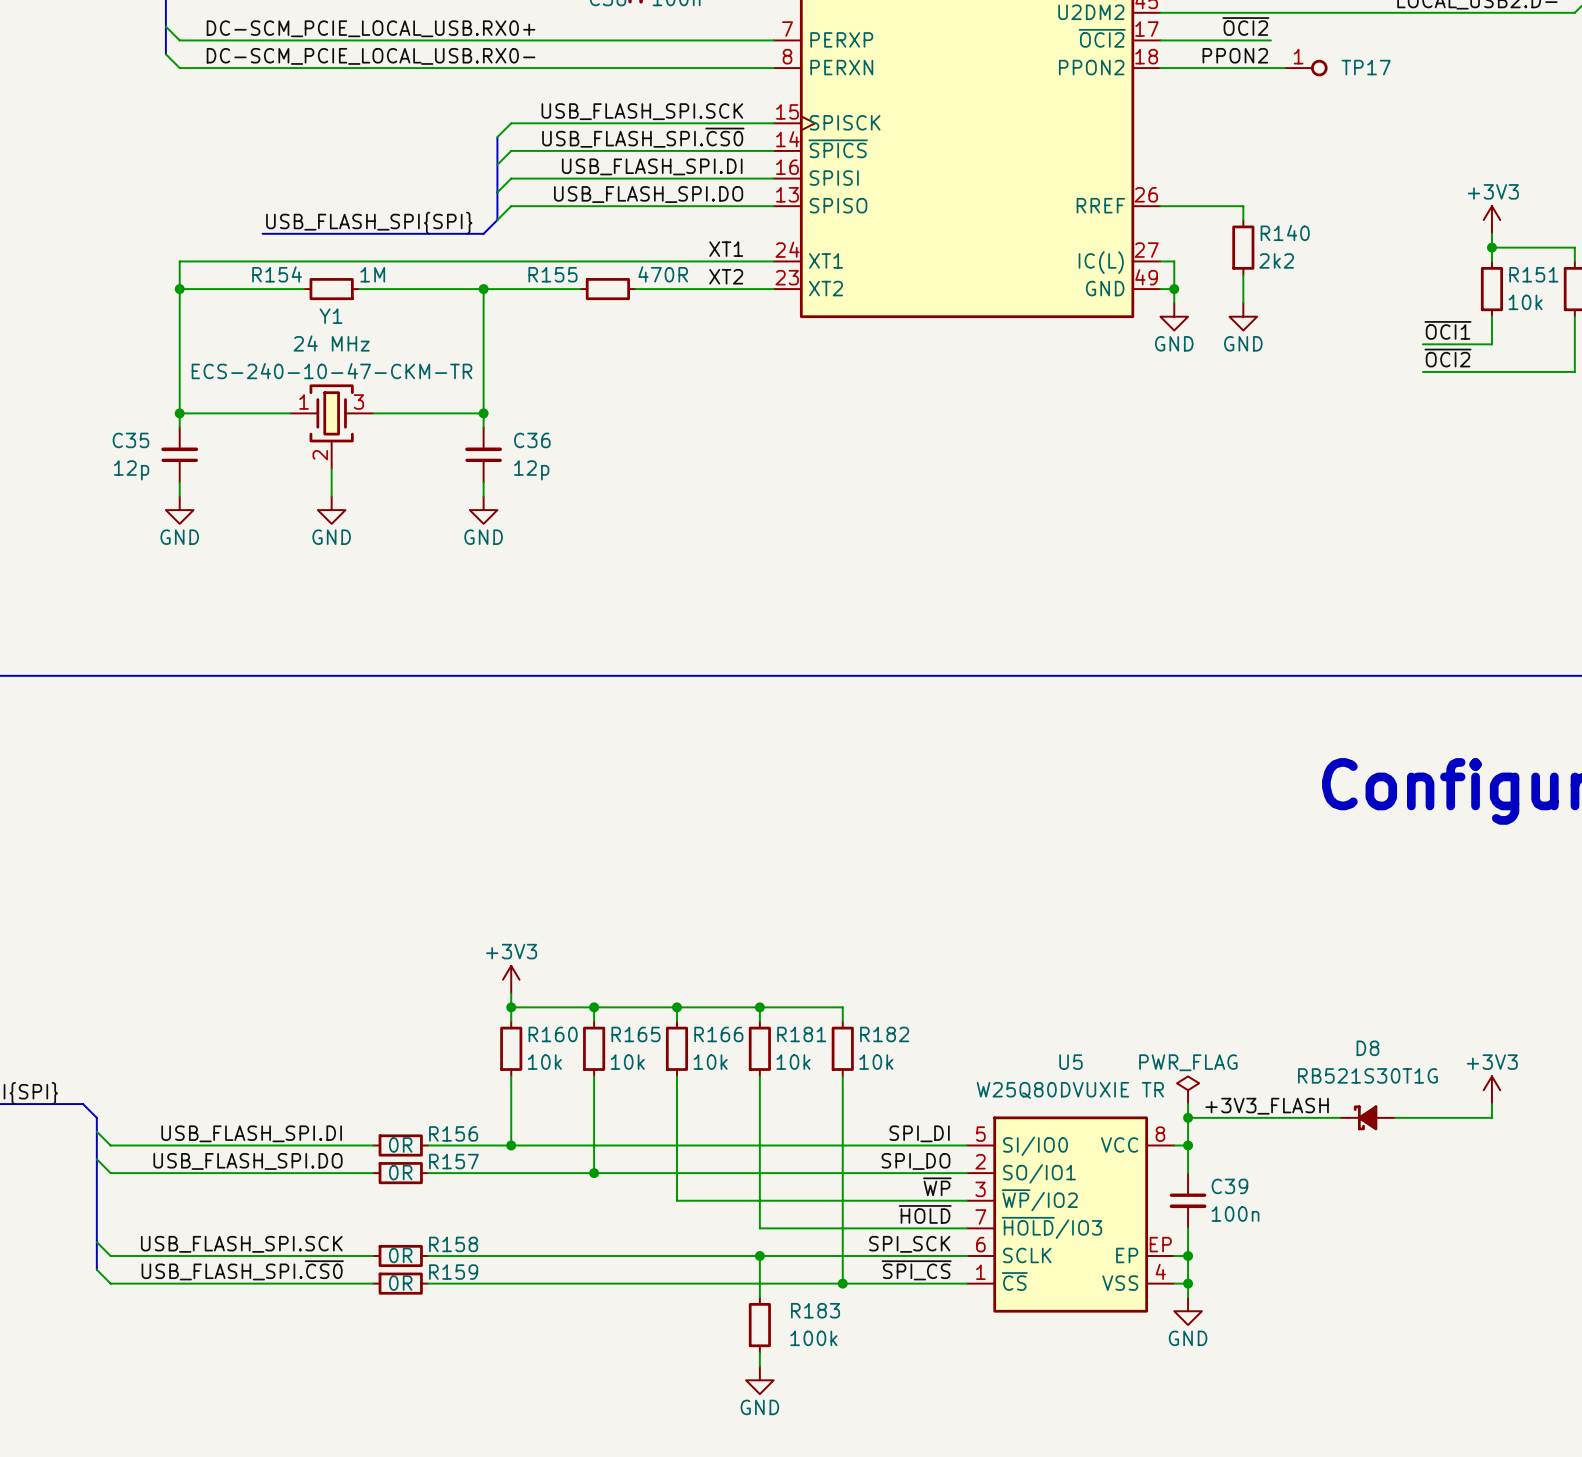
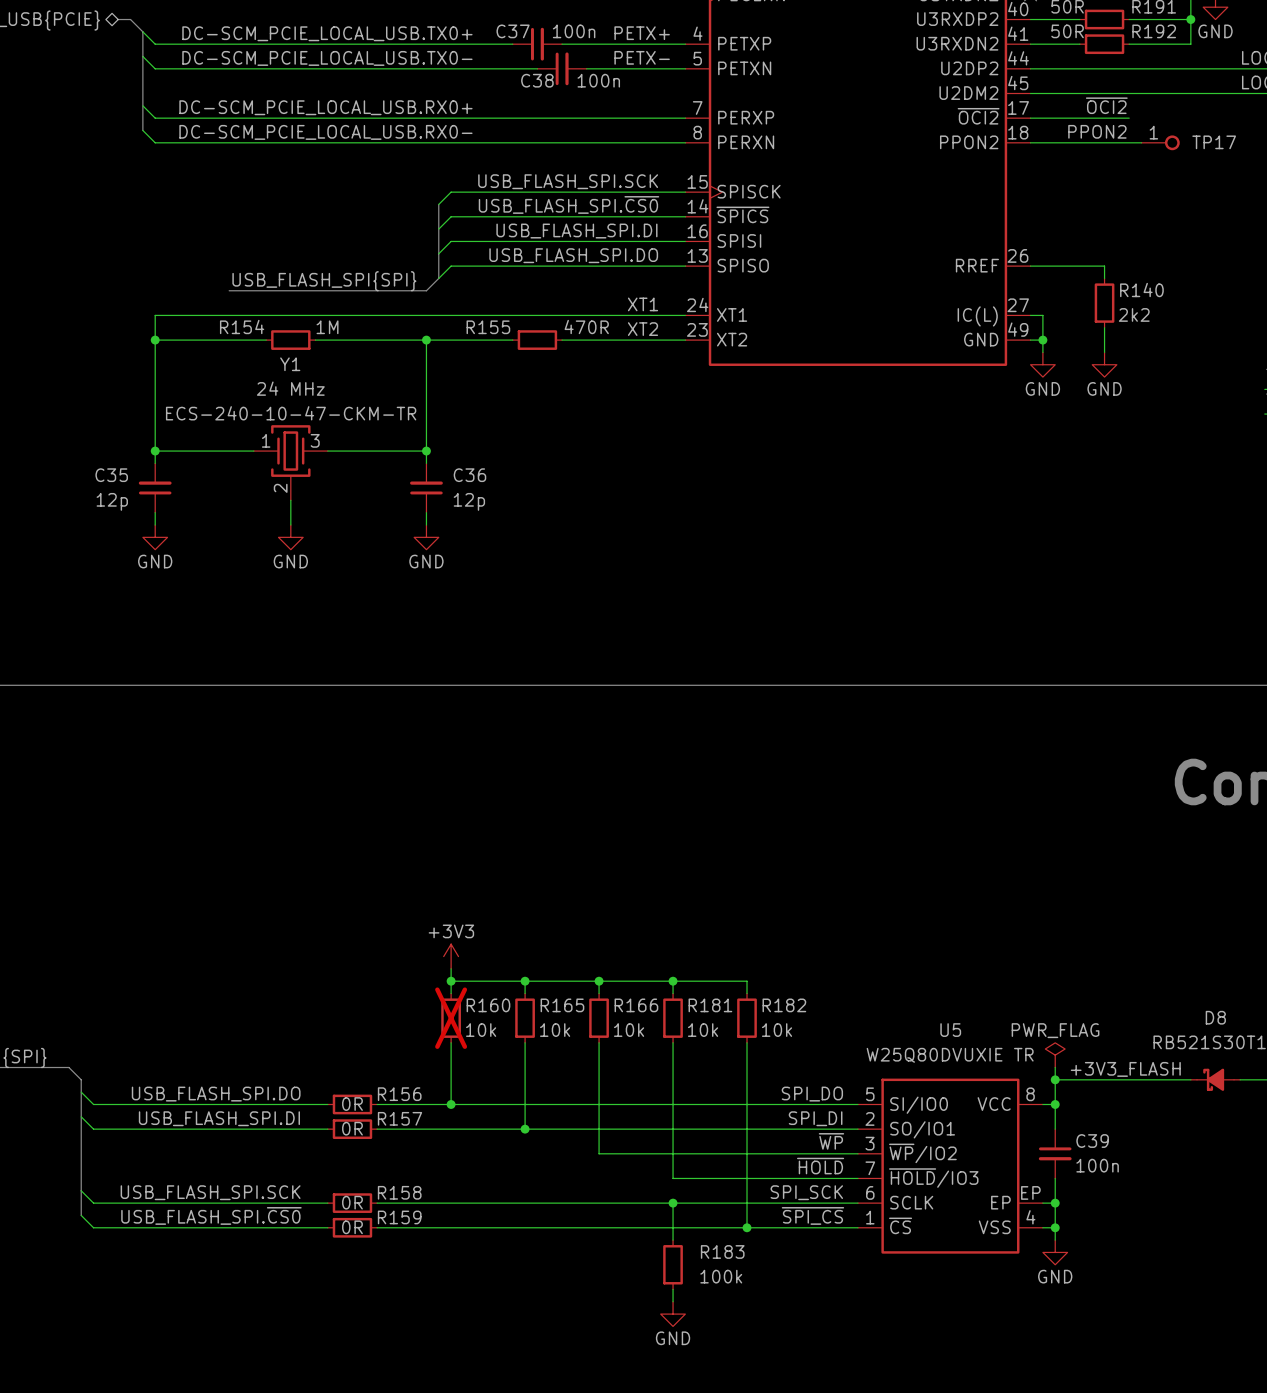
R160 do-not-place cross: none -> (451, 1018)
label: USB_FLASH_SPI.DI (251, 1133) -> USB_FLASH_SPI.DO (216, 1094)
label: SPI_DI (919, 1133) -> SPI_DO (812, 1094)
label: USB_FLASH_SPI.DO (248, 1161) -> USB_FLASH_SPI.DI (219, 1118)
label: SPI_DO (915, 1161) -> SPI_DI (815, 1118)

